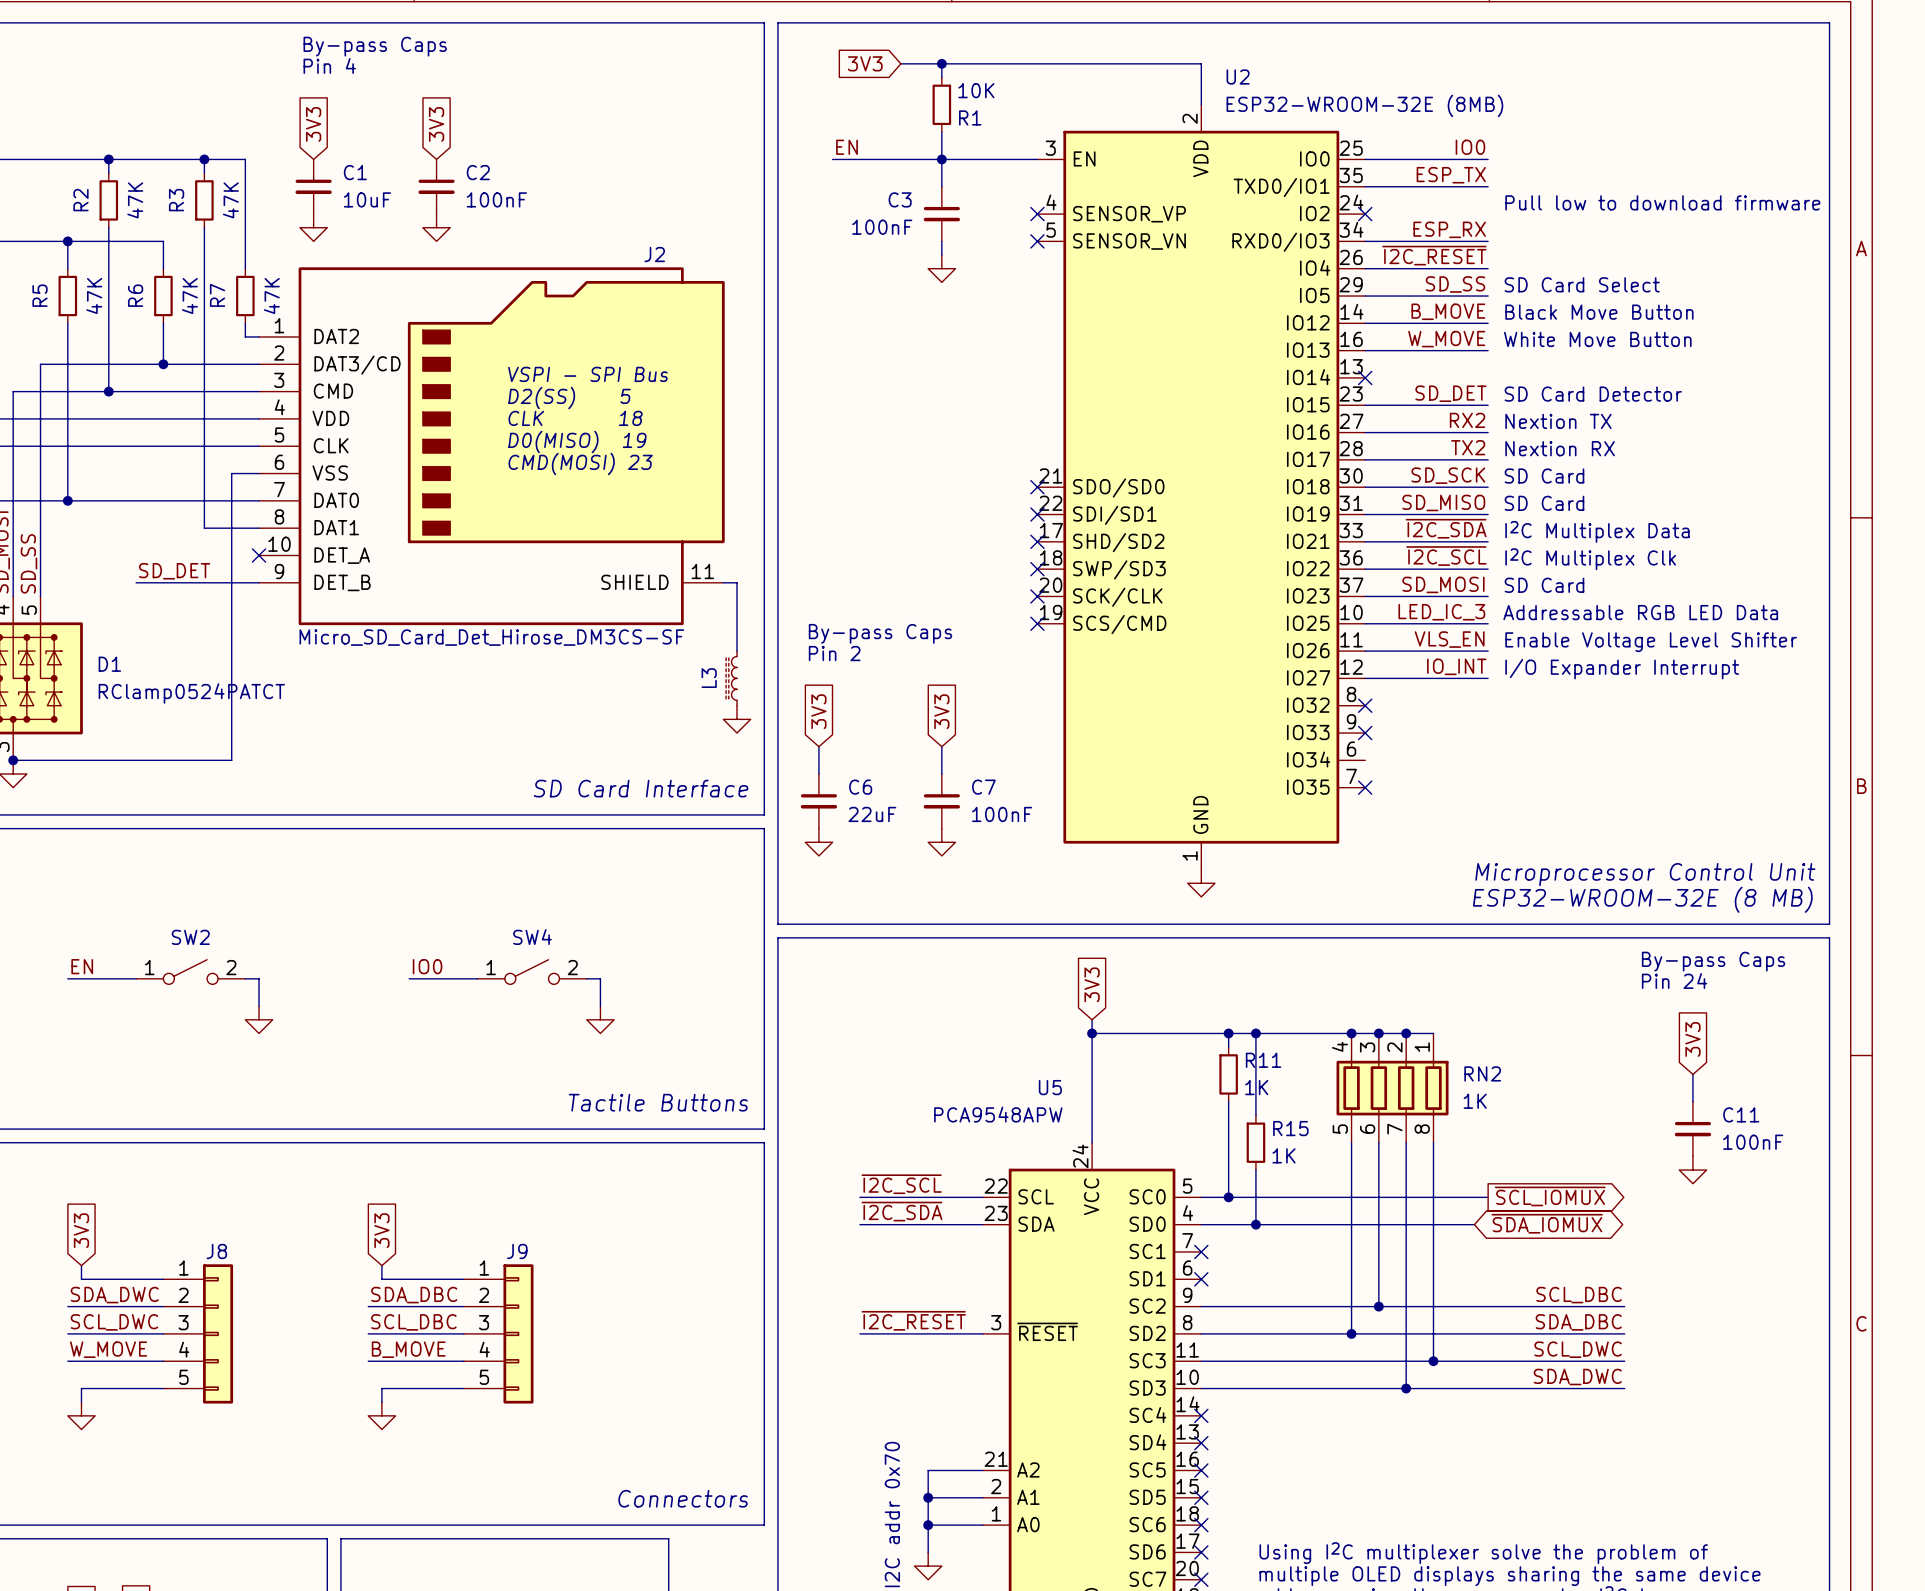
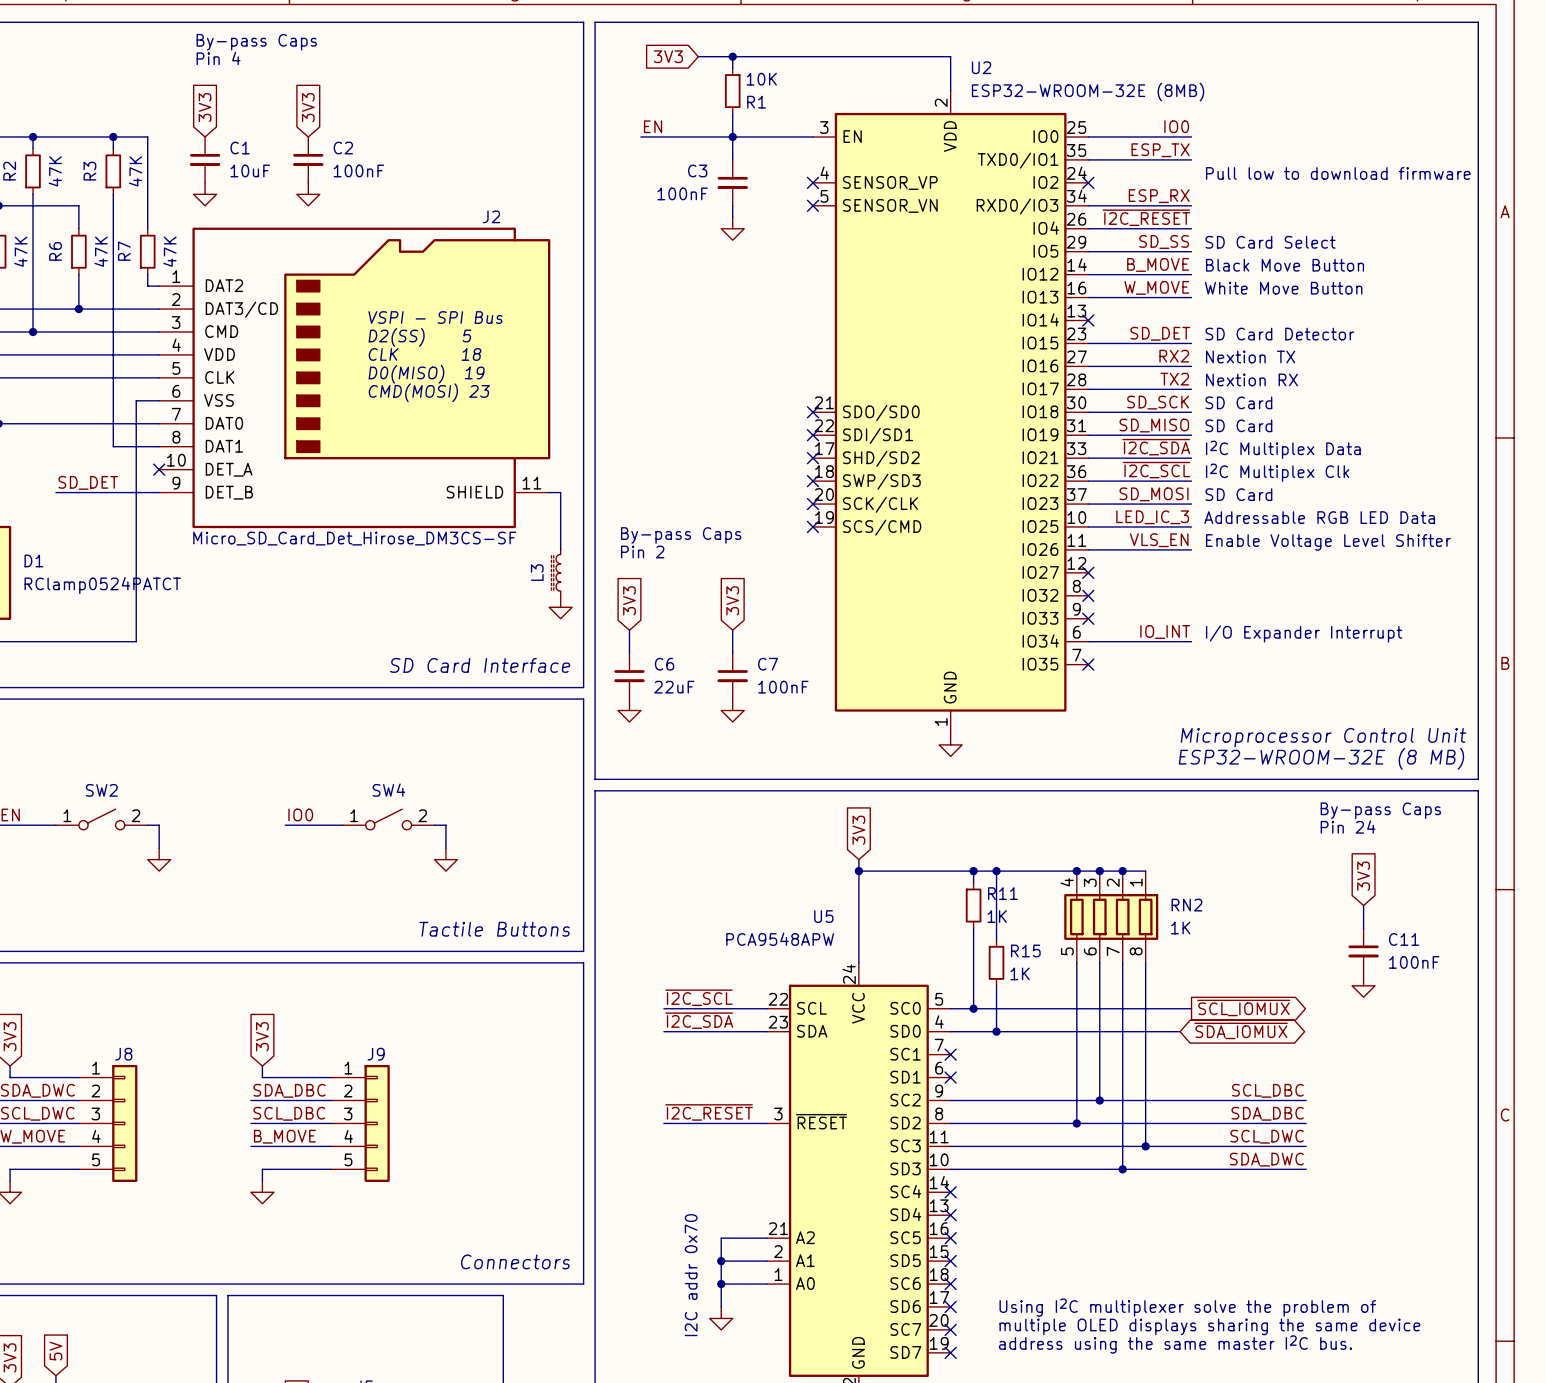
label position: IO_INT (1456, 666) -> IO_INT (1165, 632)
text position: I/O Expander Interrupt (1622, 669) -> I/O Expander Interrupt (1304, 633)
wire: (1365, 678) (1488, 678) -> (1088, 641) (1191, 641)
no-connect mark: none -> (1088, 572)

